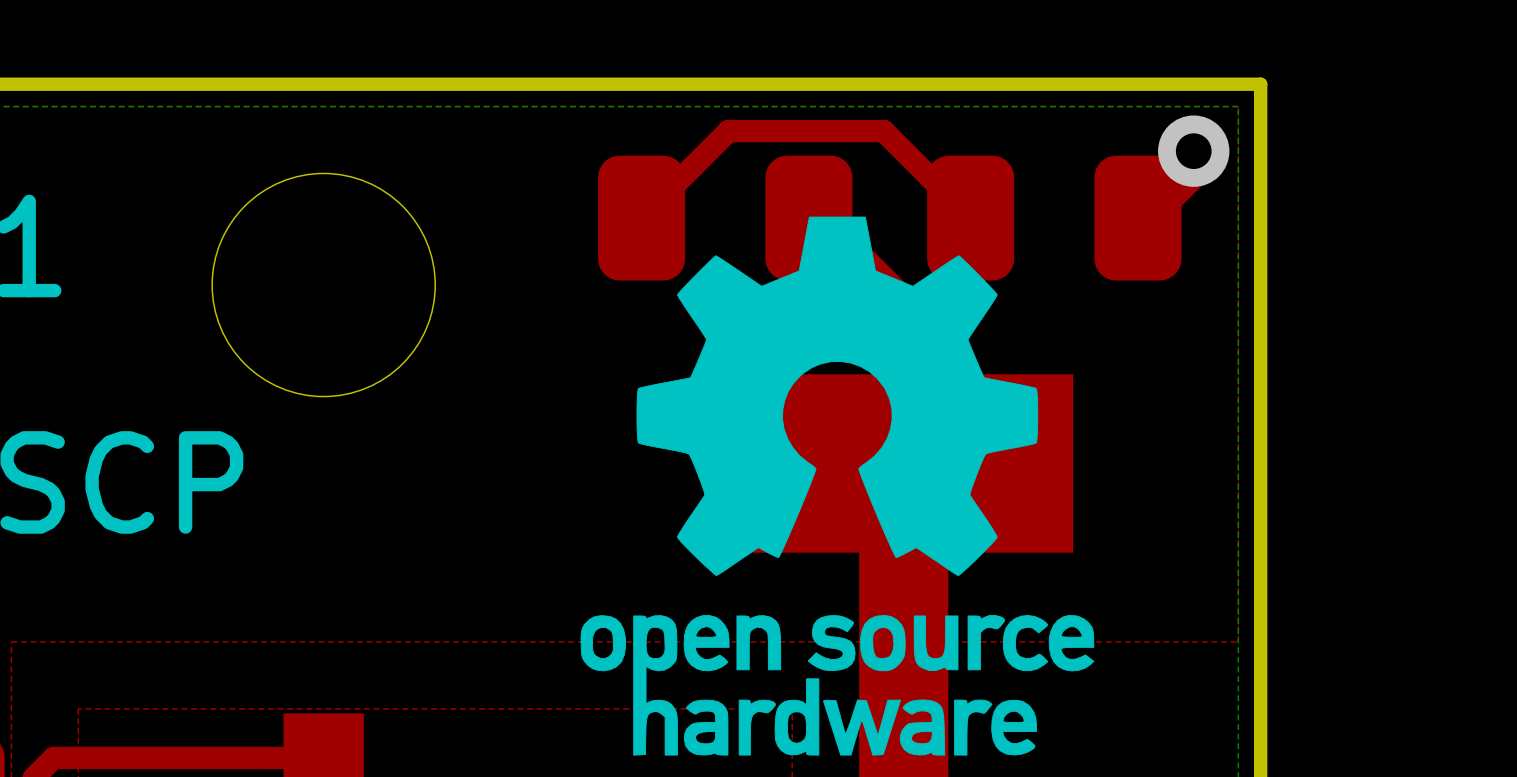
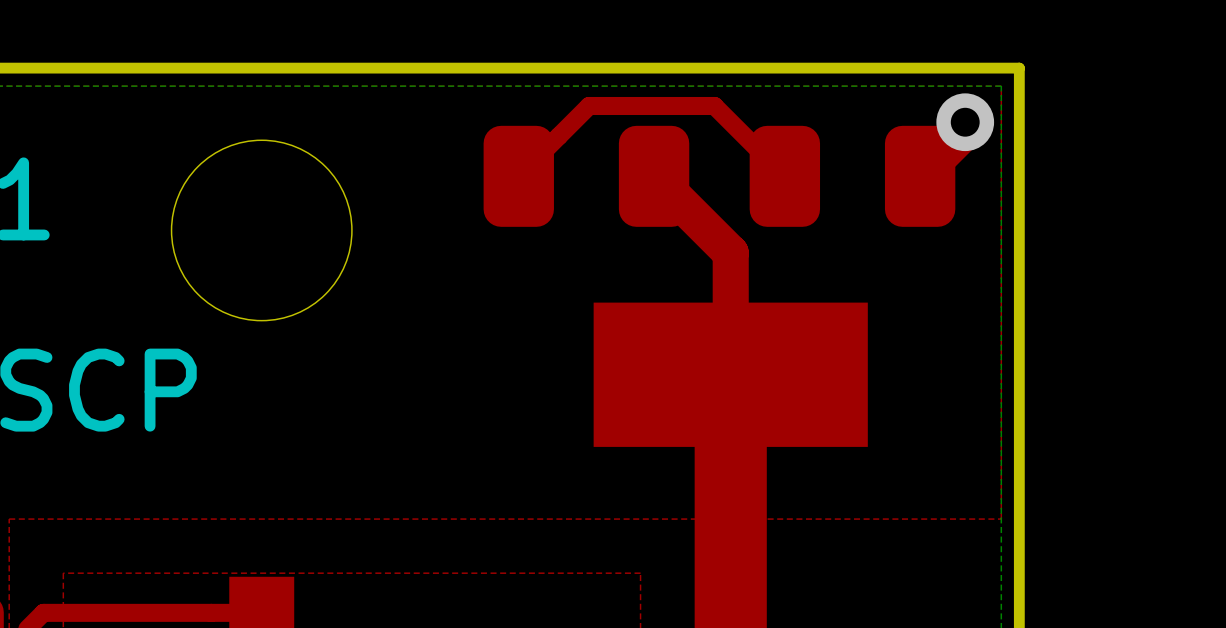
drawing: [580, 216, 1095, 756] -> none

